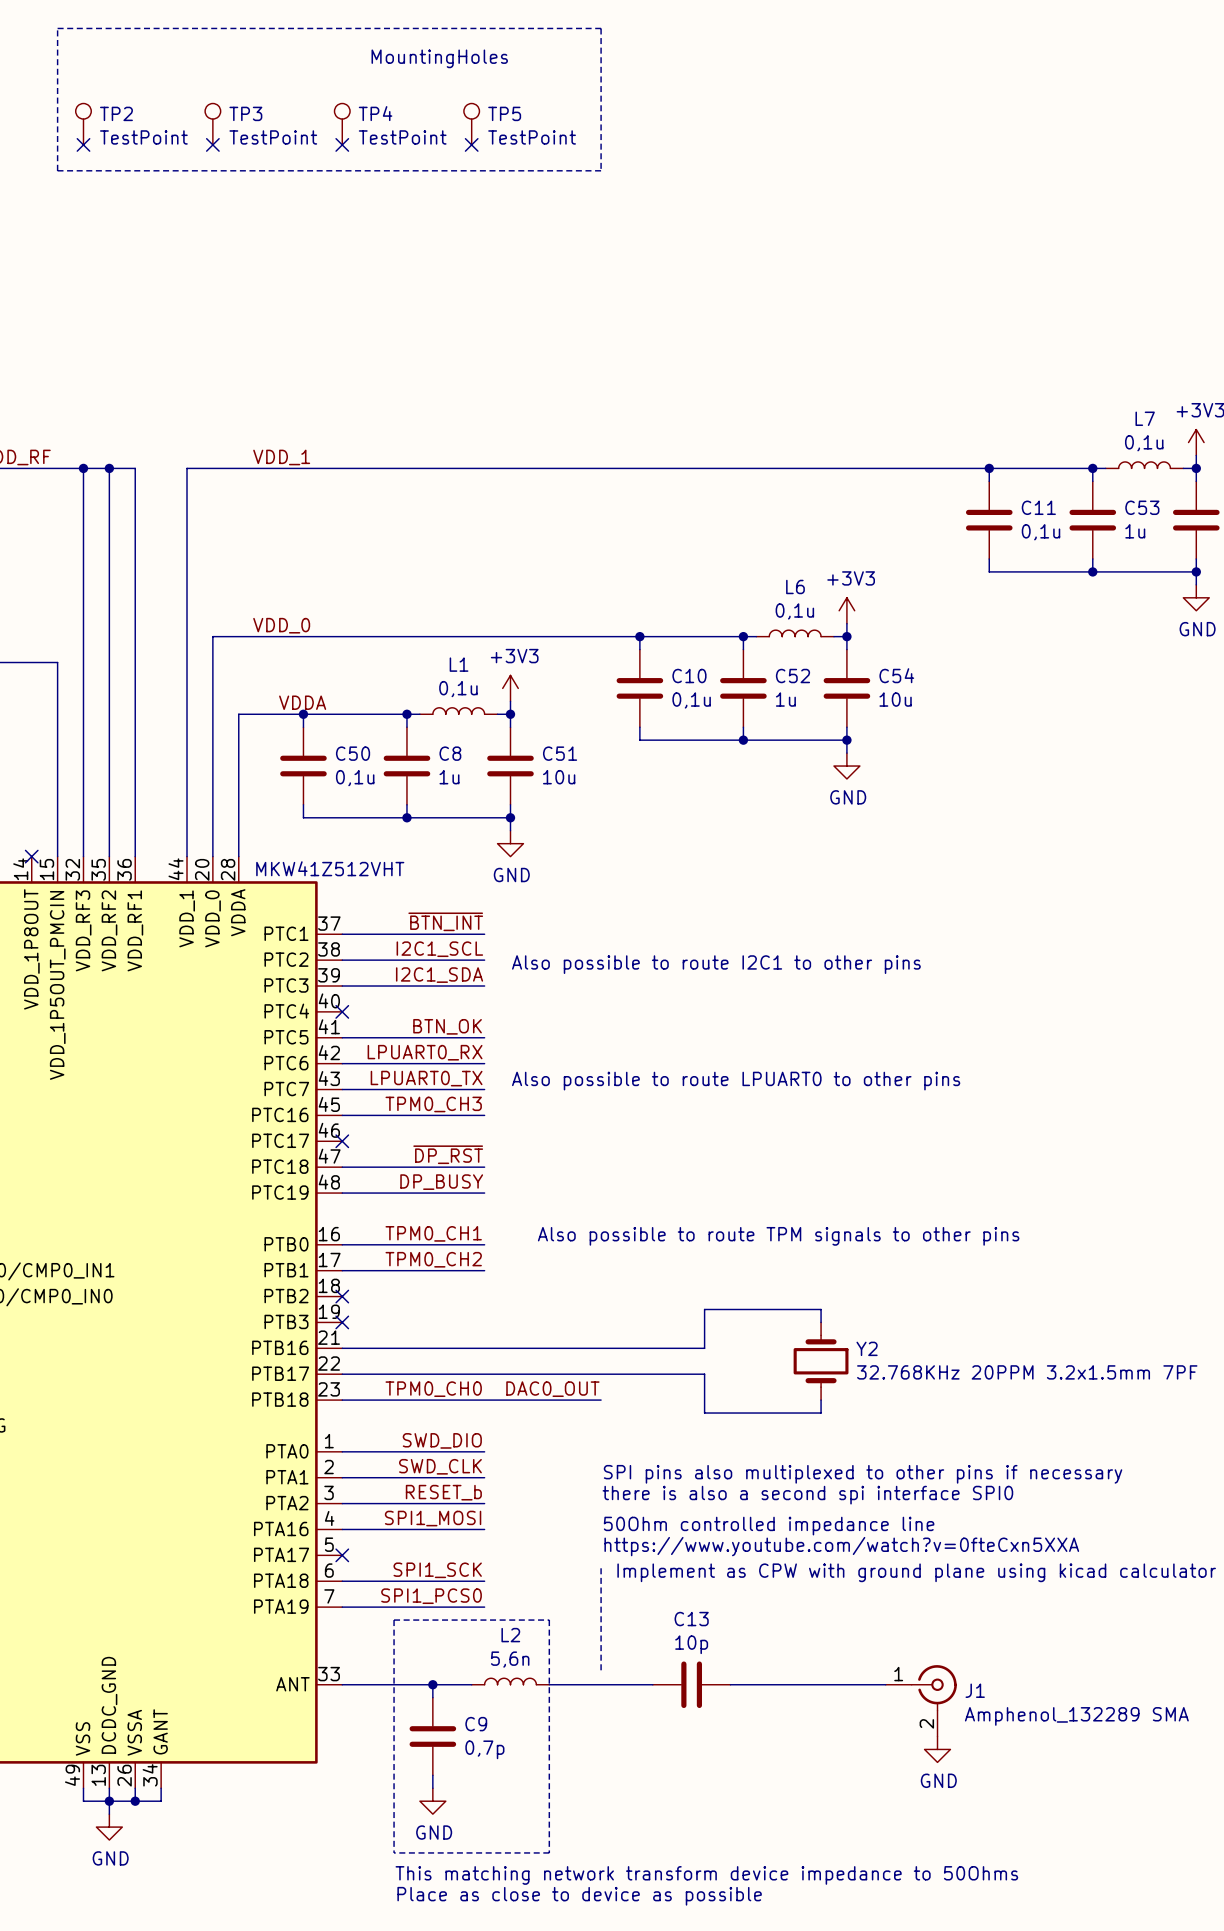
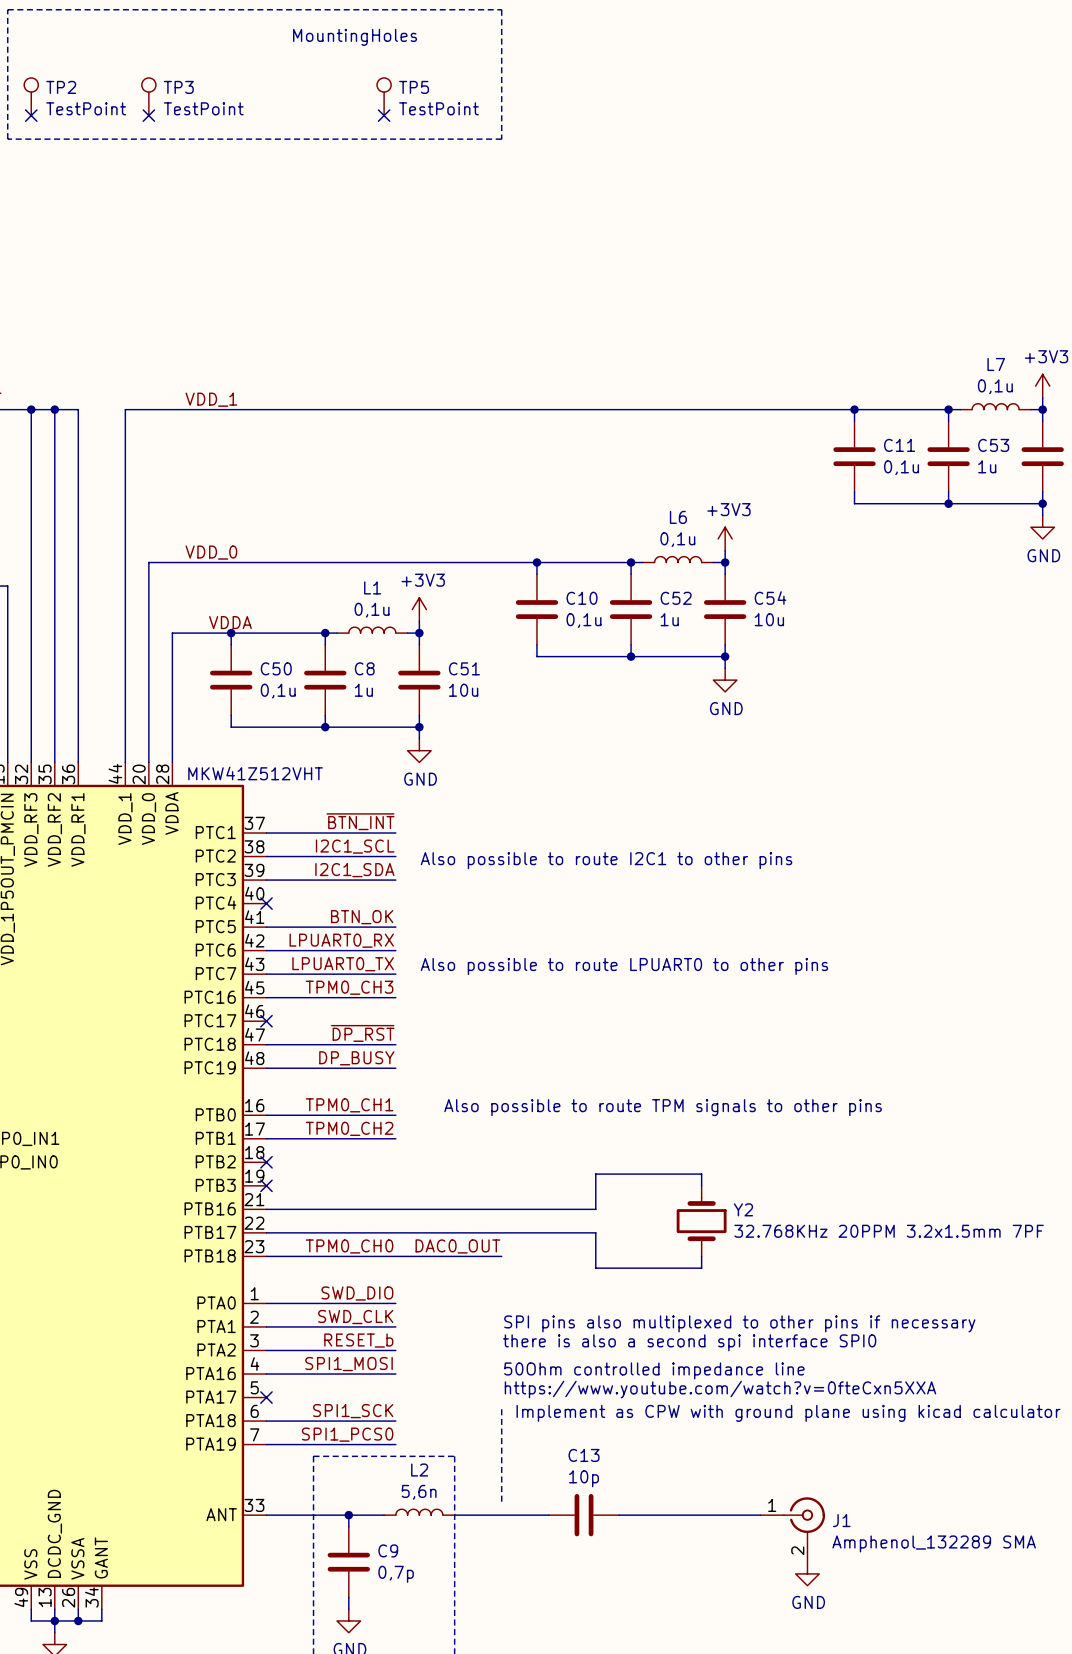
TP4: TestPoint (342, 124) -> none
no-connect mark: (342, 144) -> none

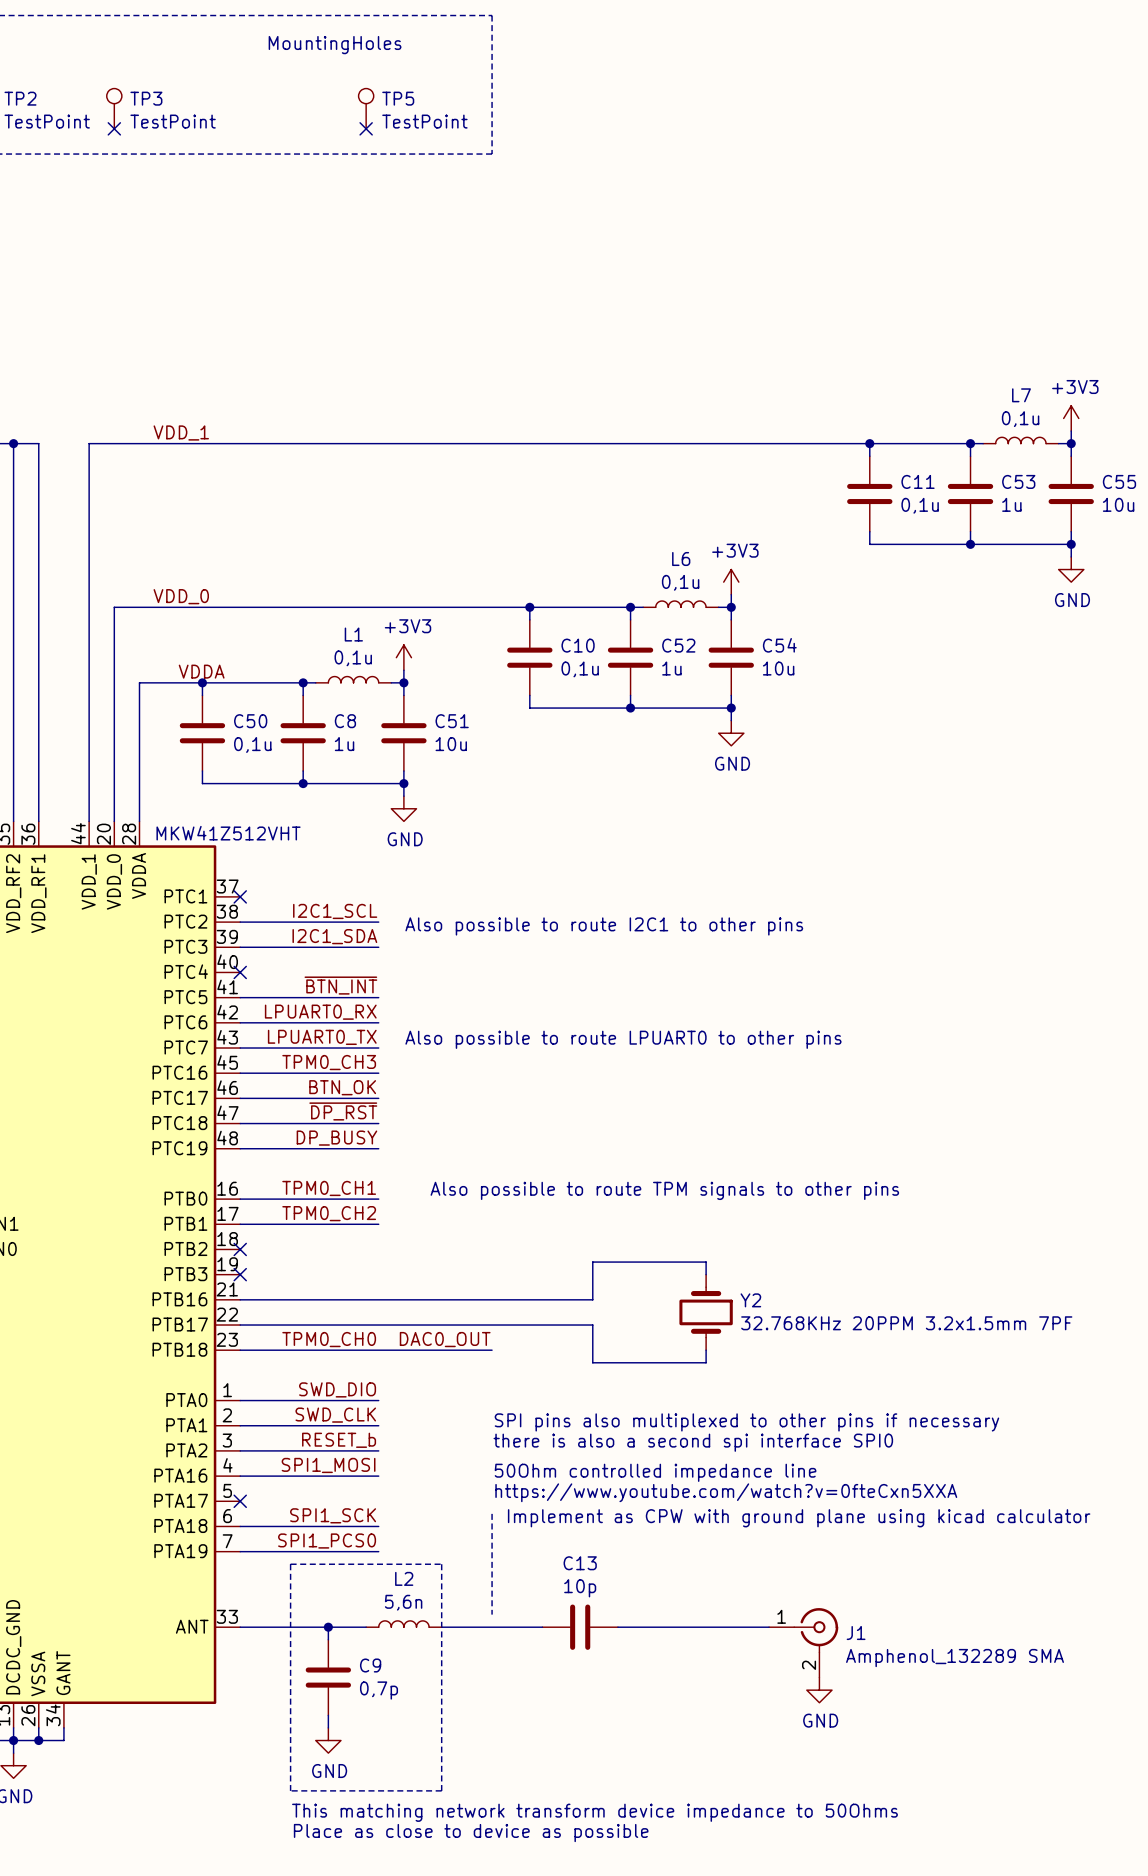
label: ~{BTN_INT} (360, 821) -> none
wire: (266, 833) (395, 833) -> (240, 1098) (378, 1098)
no-connect mark: none -> (240, 896)
label: BTN_OK (362, 917) -> ~{BTN_INT} (340, 985)
label: none -> BTN_OK (342, 1087)
no-connect mark: (266, 1021) -> none

